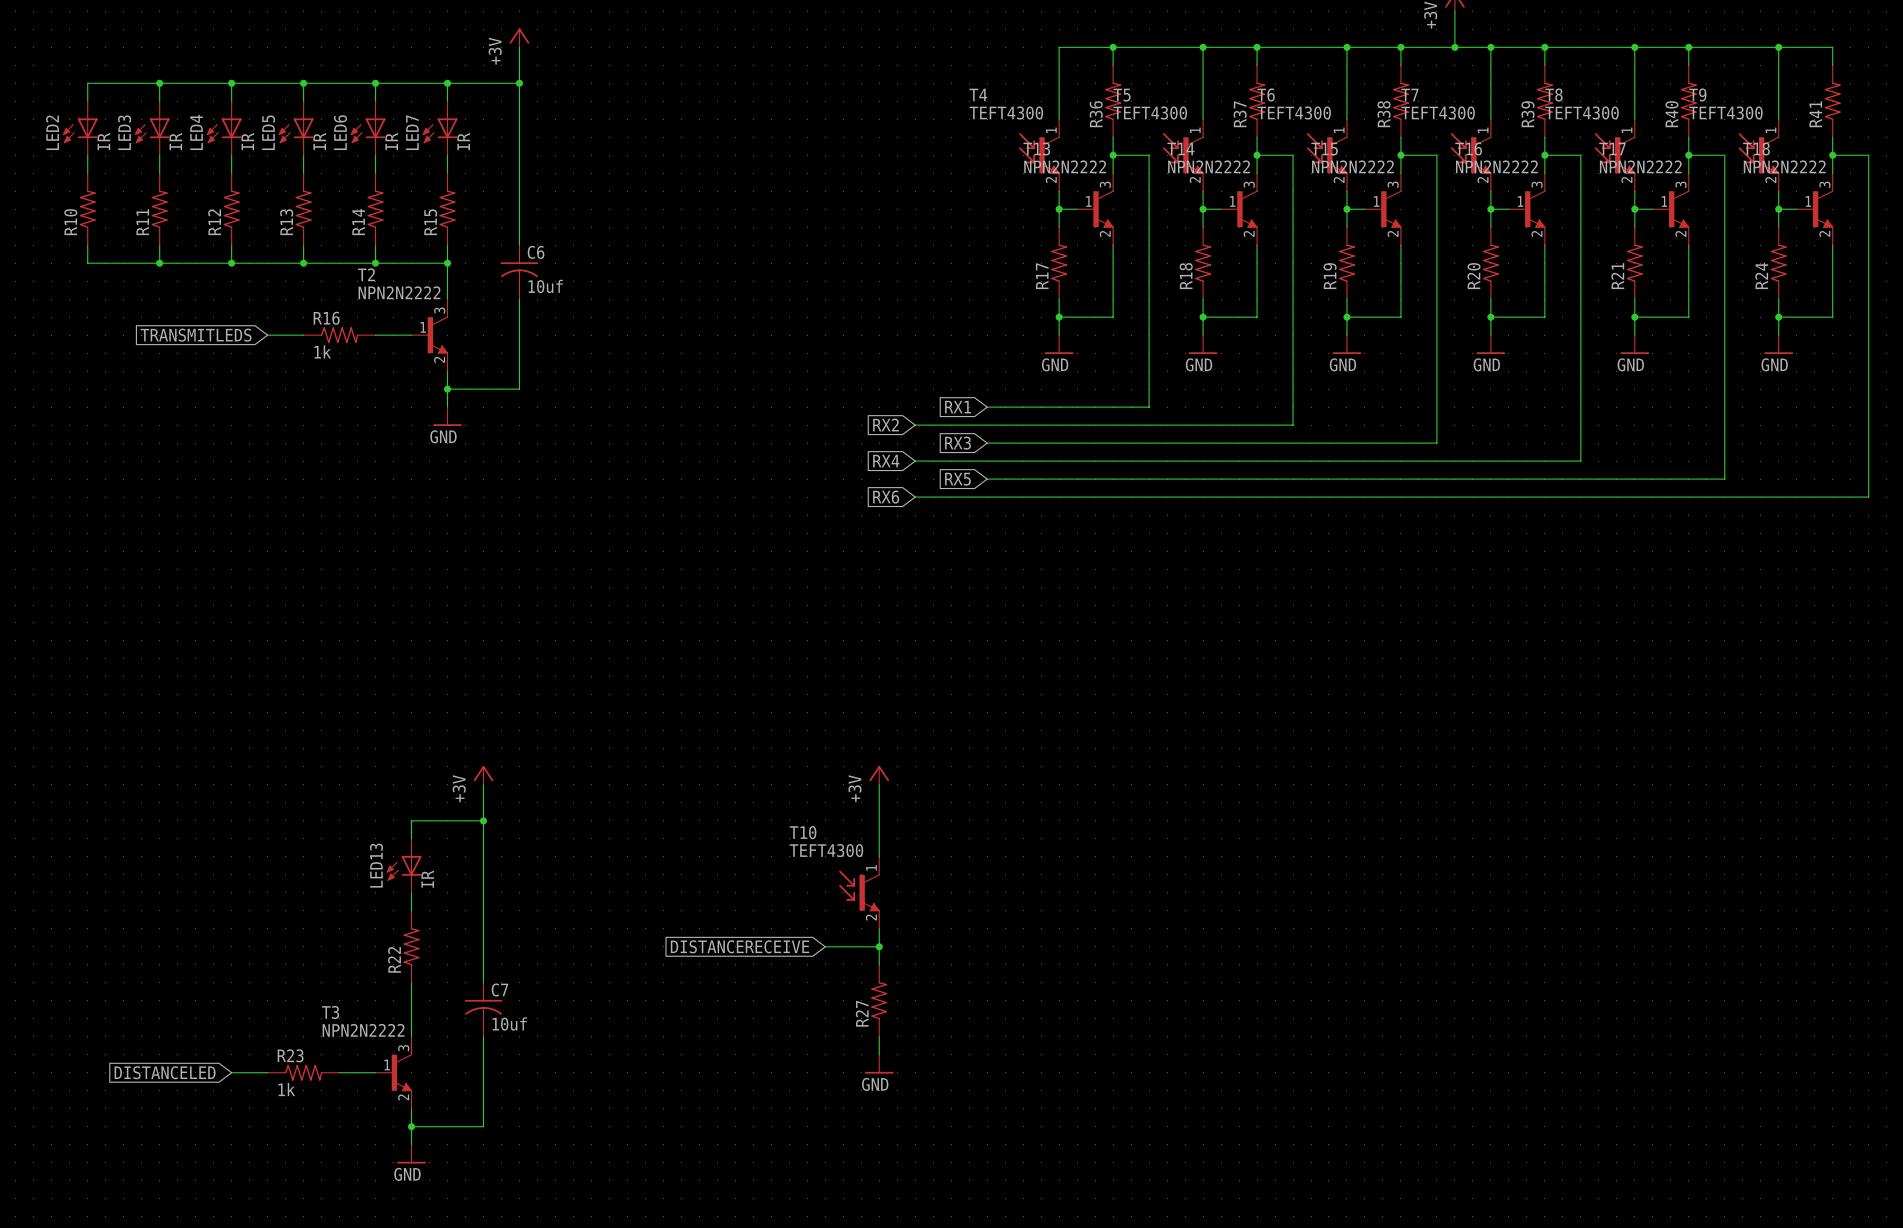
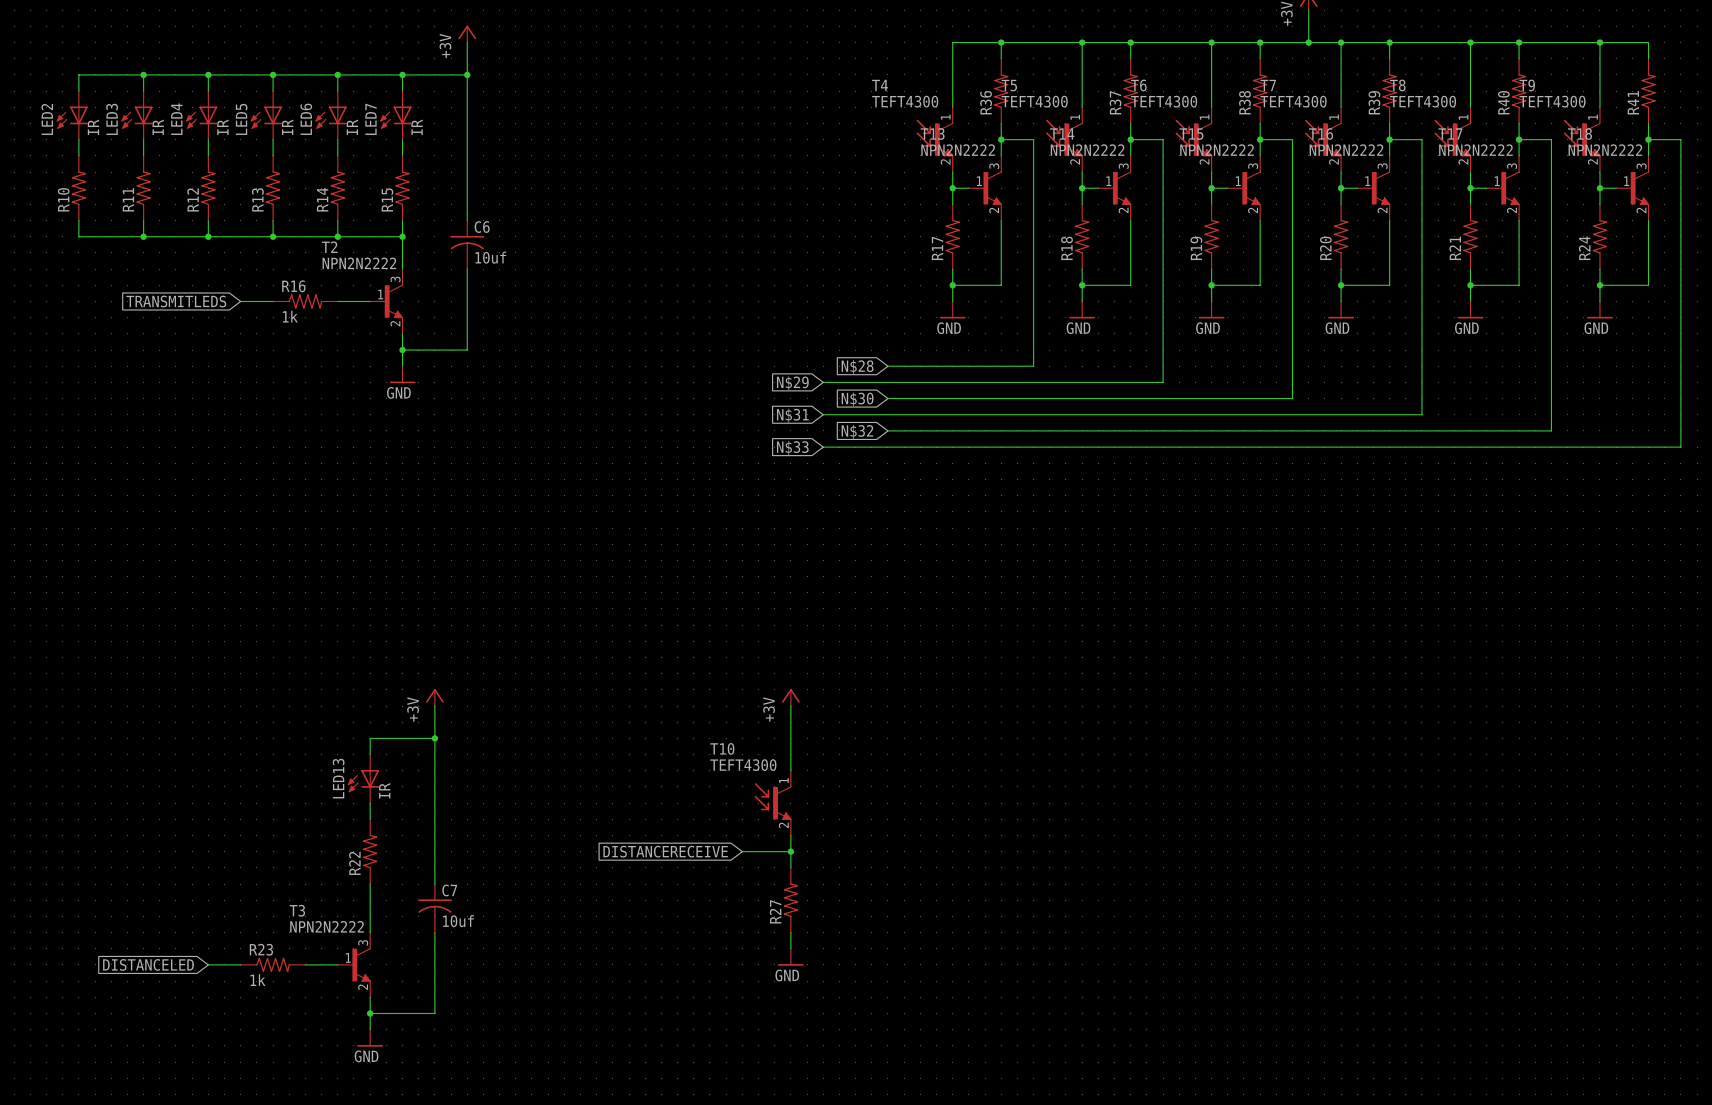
global label: RX1 (958, 407) -> N$28 (857, 367)
global label: RX2 (885, 424) -> N$29 (792, 383)
global label: RX3 (958, 443) -> N$30 (857, 399)
global label: RX4 (886, 461) -> N$31 (792, 415)
global label: RX5 (957, 479) -> N$32 (857, 431)
global label: RX6 (886, 497) -> N$33 (792, 448)

